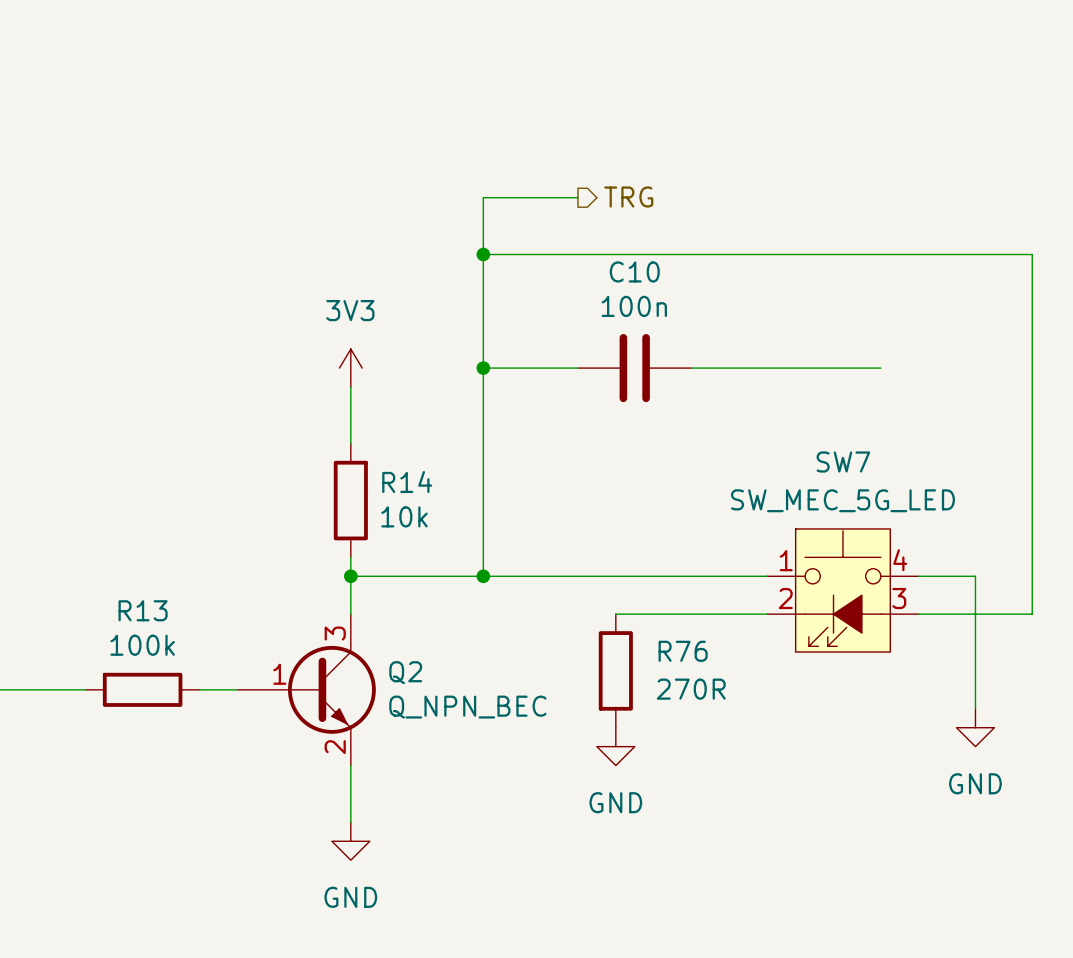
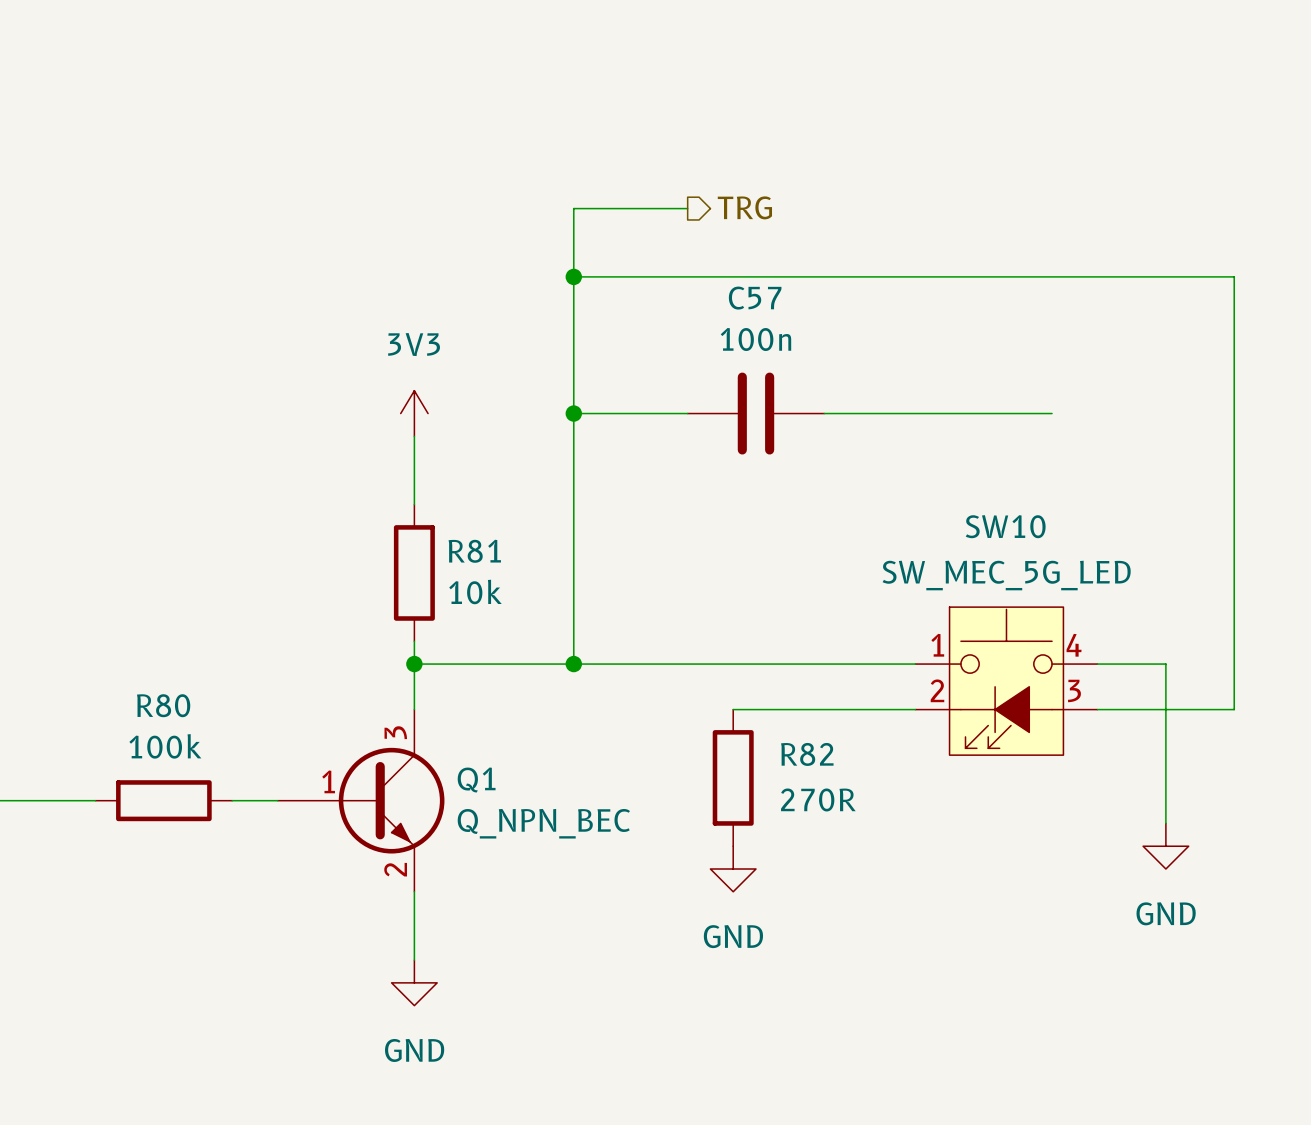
C10 name: C10 (634, 271) -> C57 (755, 298)
SW7 name: SW7 (843, 462) -> SW10 (1005, 526)
R14 name: R14 (407, 482) -> R81 (474, 551)
R13 name: R13 (143, 610) -> R80 (163, 705)
R76 name: R76 (683, 651) -> R82 (807, 754)
Q2 name: Q2 (405, 672) -> Q1 (476, 779)

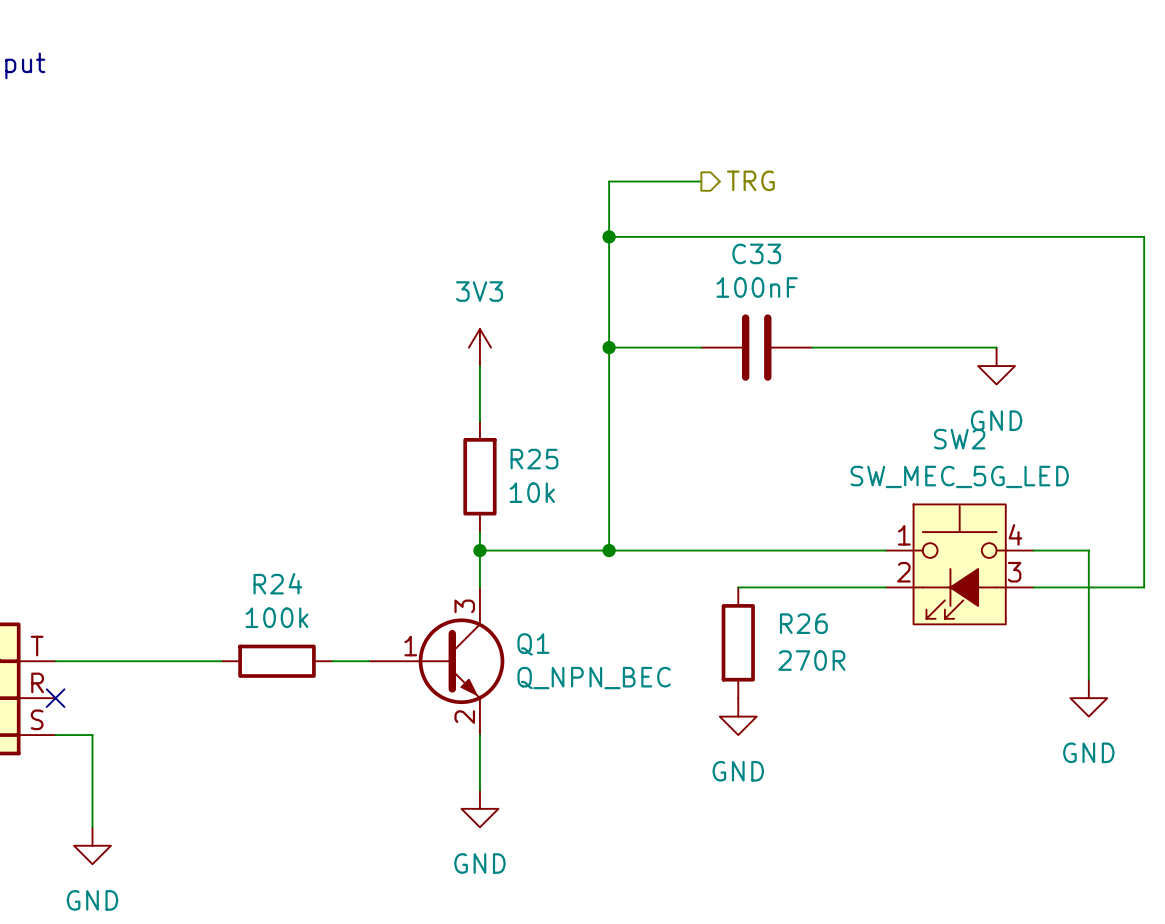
C57 name: C57 (755, 298) -> C33 (756, 253)
C57 value: 100n (755, 339) -> 100nF (757, 287)
power symbol: none -> GND (996, 366)
SW10 name: SW10 (1005, 526) -> SW2 (959, 439)
R81 name: R81 (474, 551) -> R25 (534, 459)
R80 name: R80 (163, 705) -> R24 (277, 583)
R82 name: R82 (807, 754) -> R26 (803, 623)

